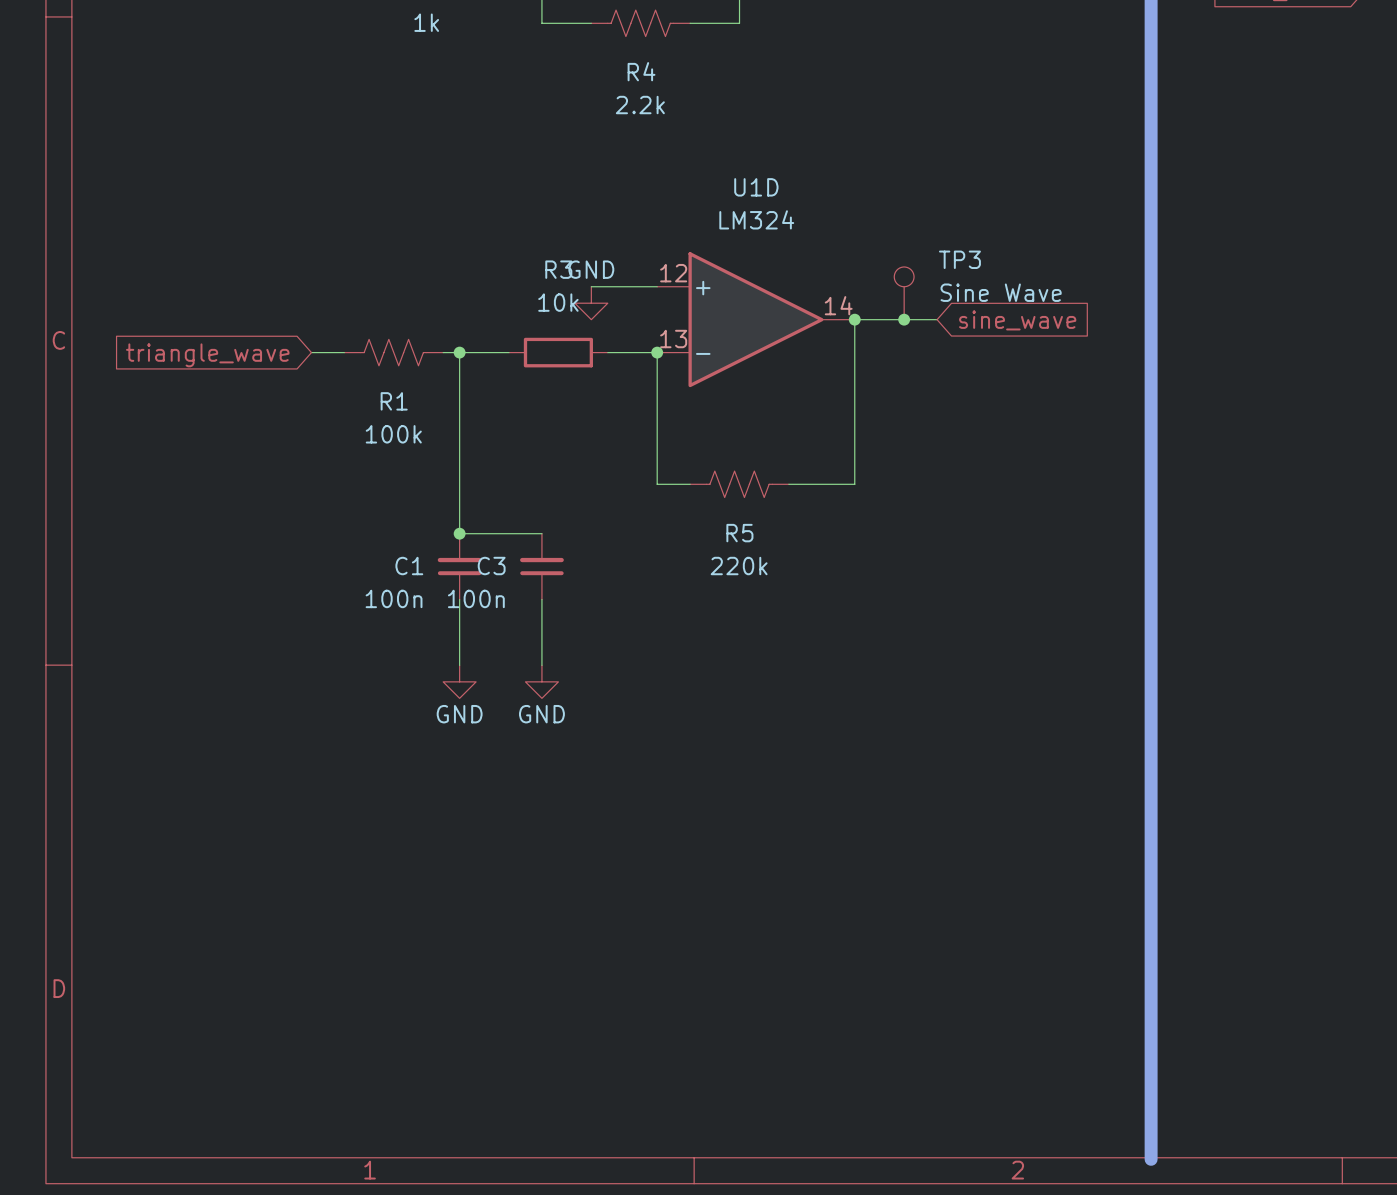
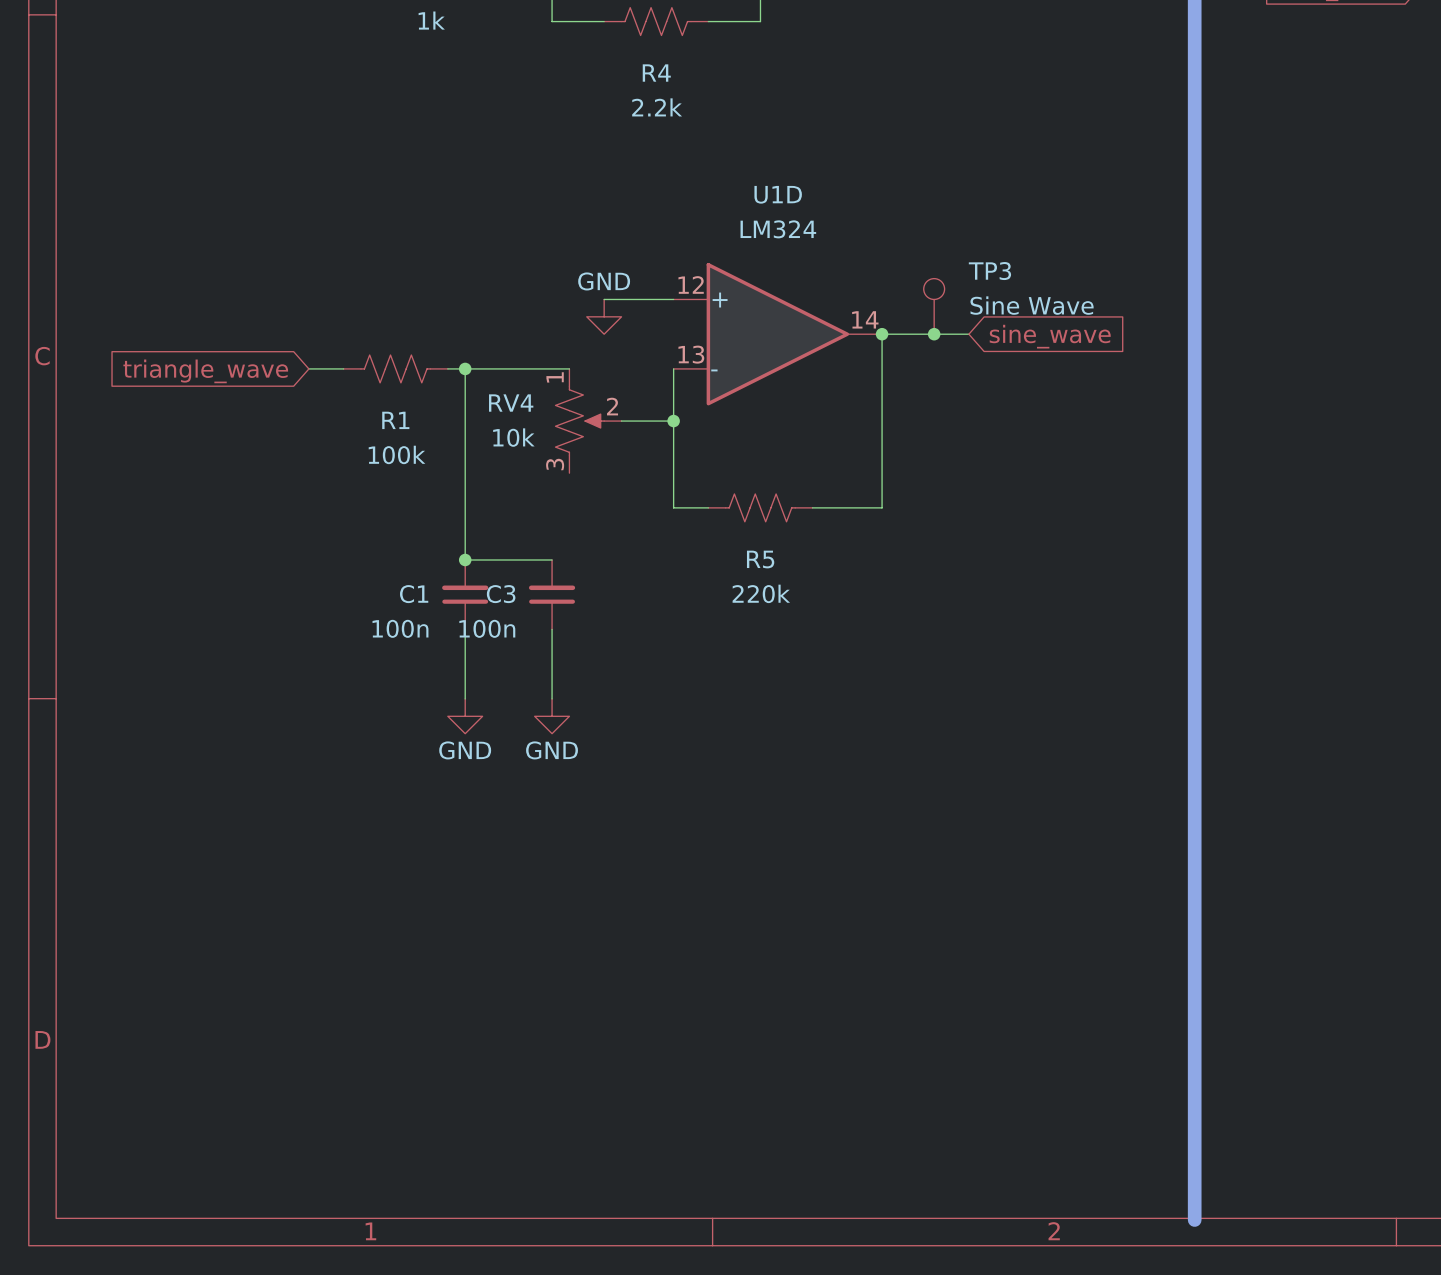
wire: none -> (517, 368) (569, 368)
R3: 10k (558, 352) -> none
wire: (607, 352) (657, 352) -> (621, 421) (673, 421)
junction position: (657, 352) -> (673, 421)
RV4: none -> 10k (588, 421)

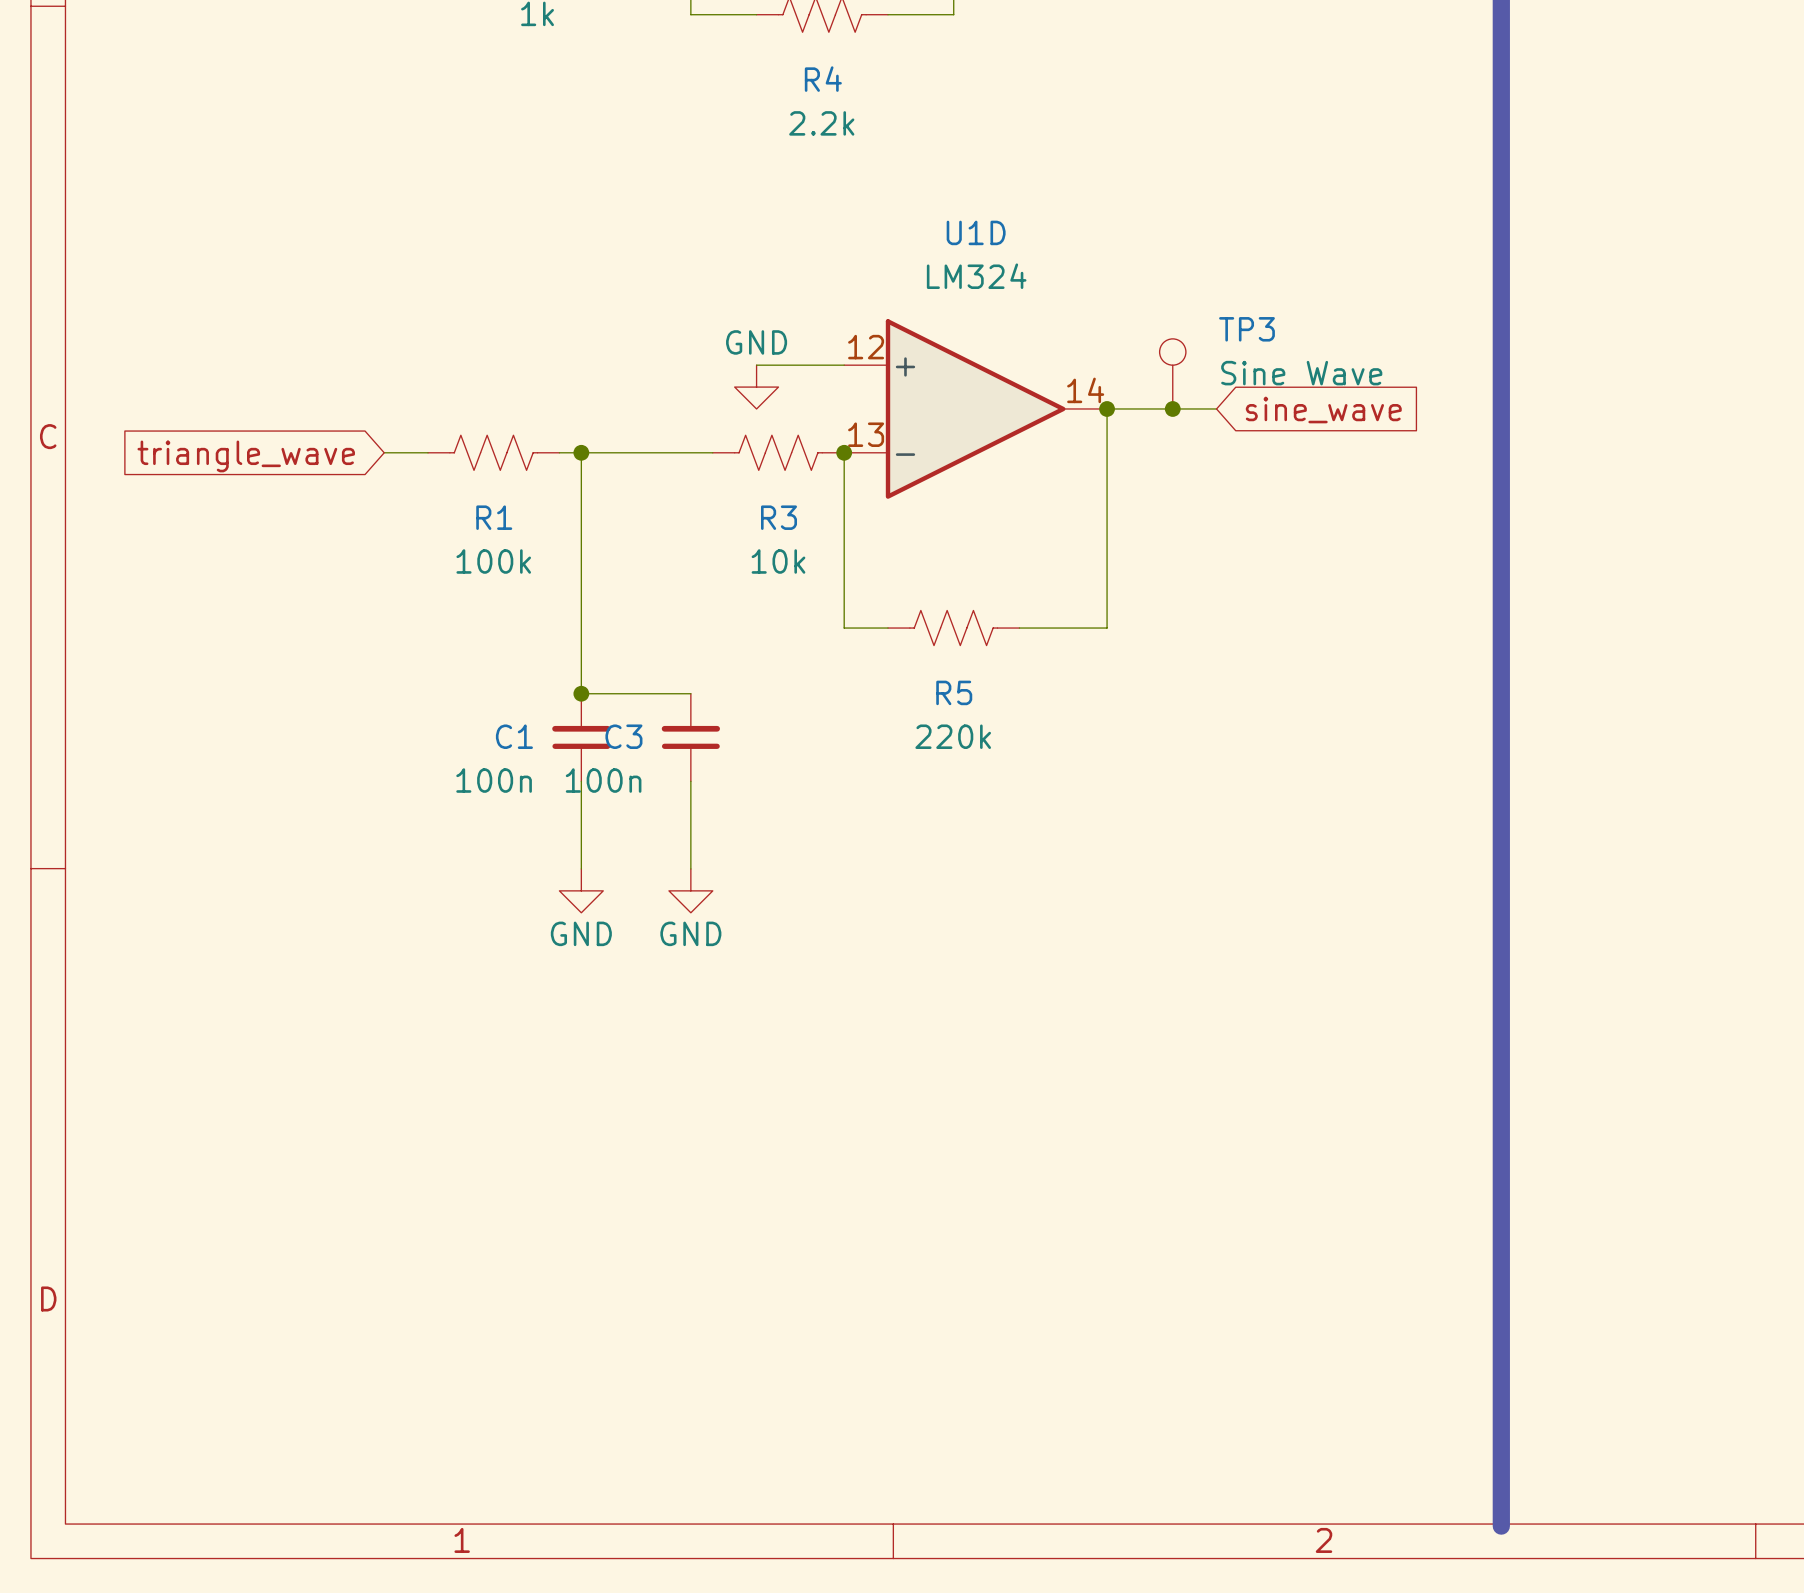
R3: none -> 10k (778, 452)
RV4: 10k (588, 421) -> none
wire: (621, 421) (673, 421) -> none
junction position: (673, 421) -> (844, 452)

